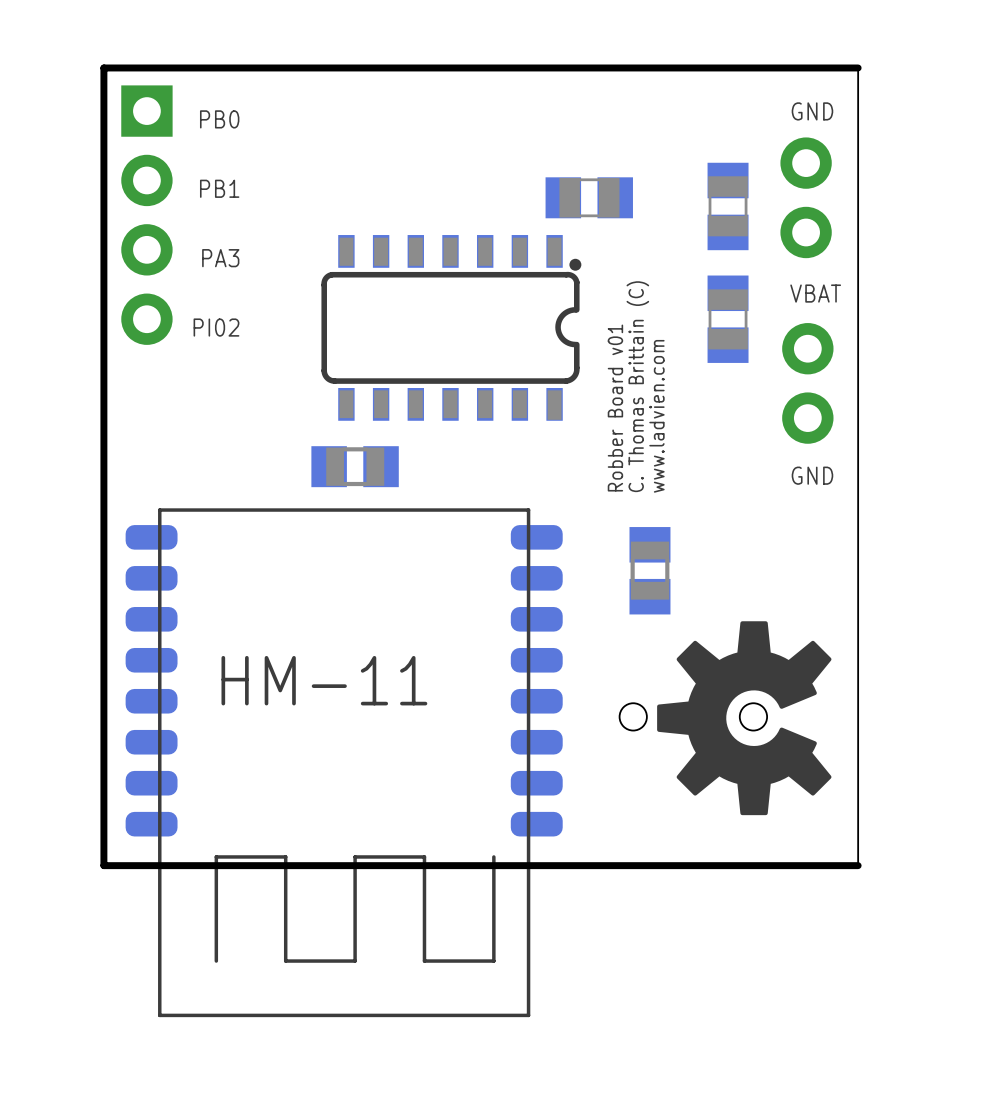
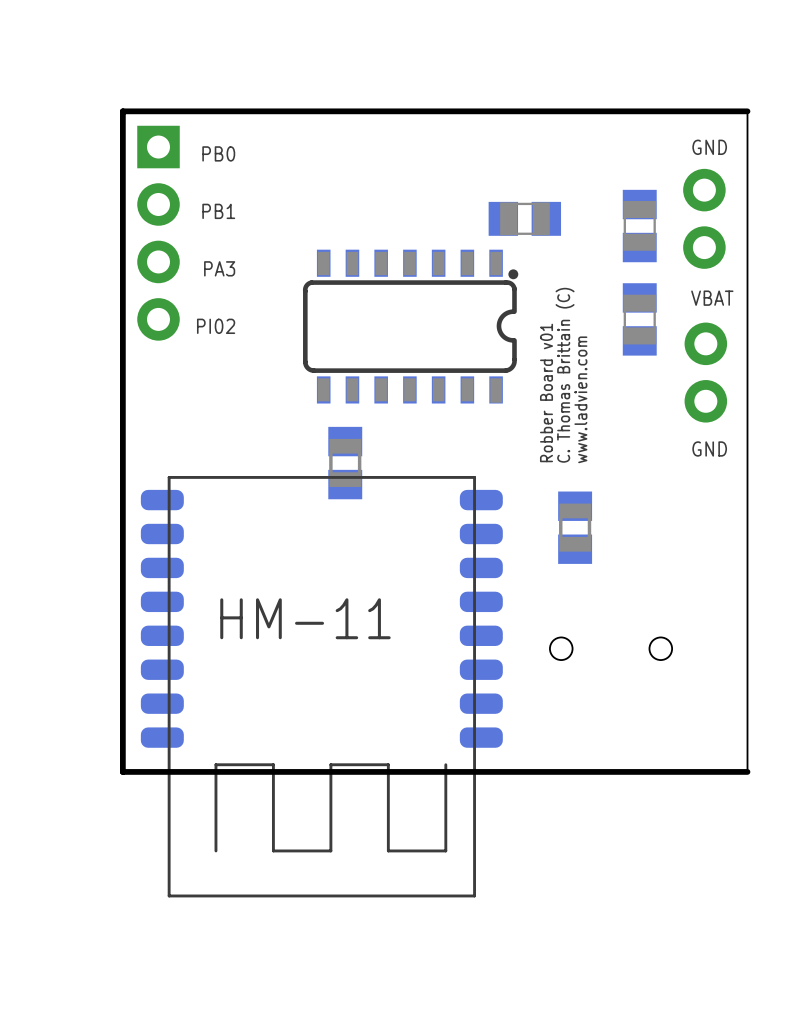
part rotation: 0° (355, 466) -> 90° clockwise (345, 463)
drawing: [657, 621, 832, 816] -> none

